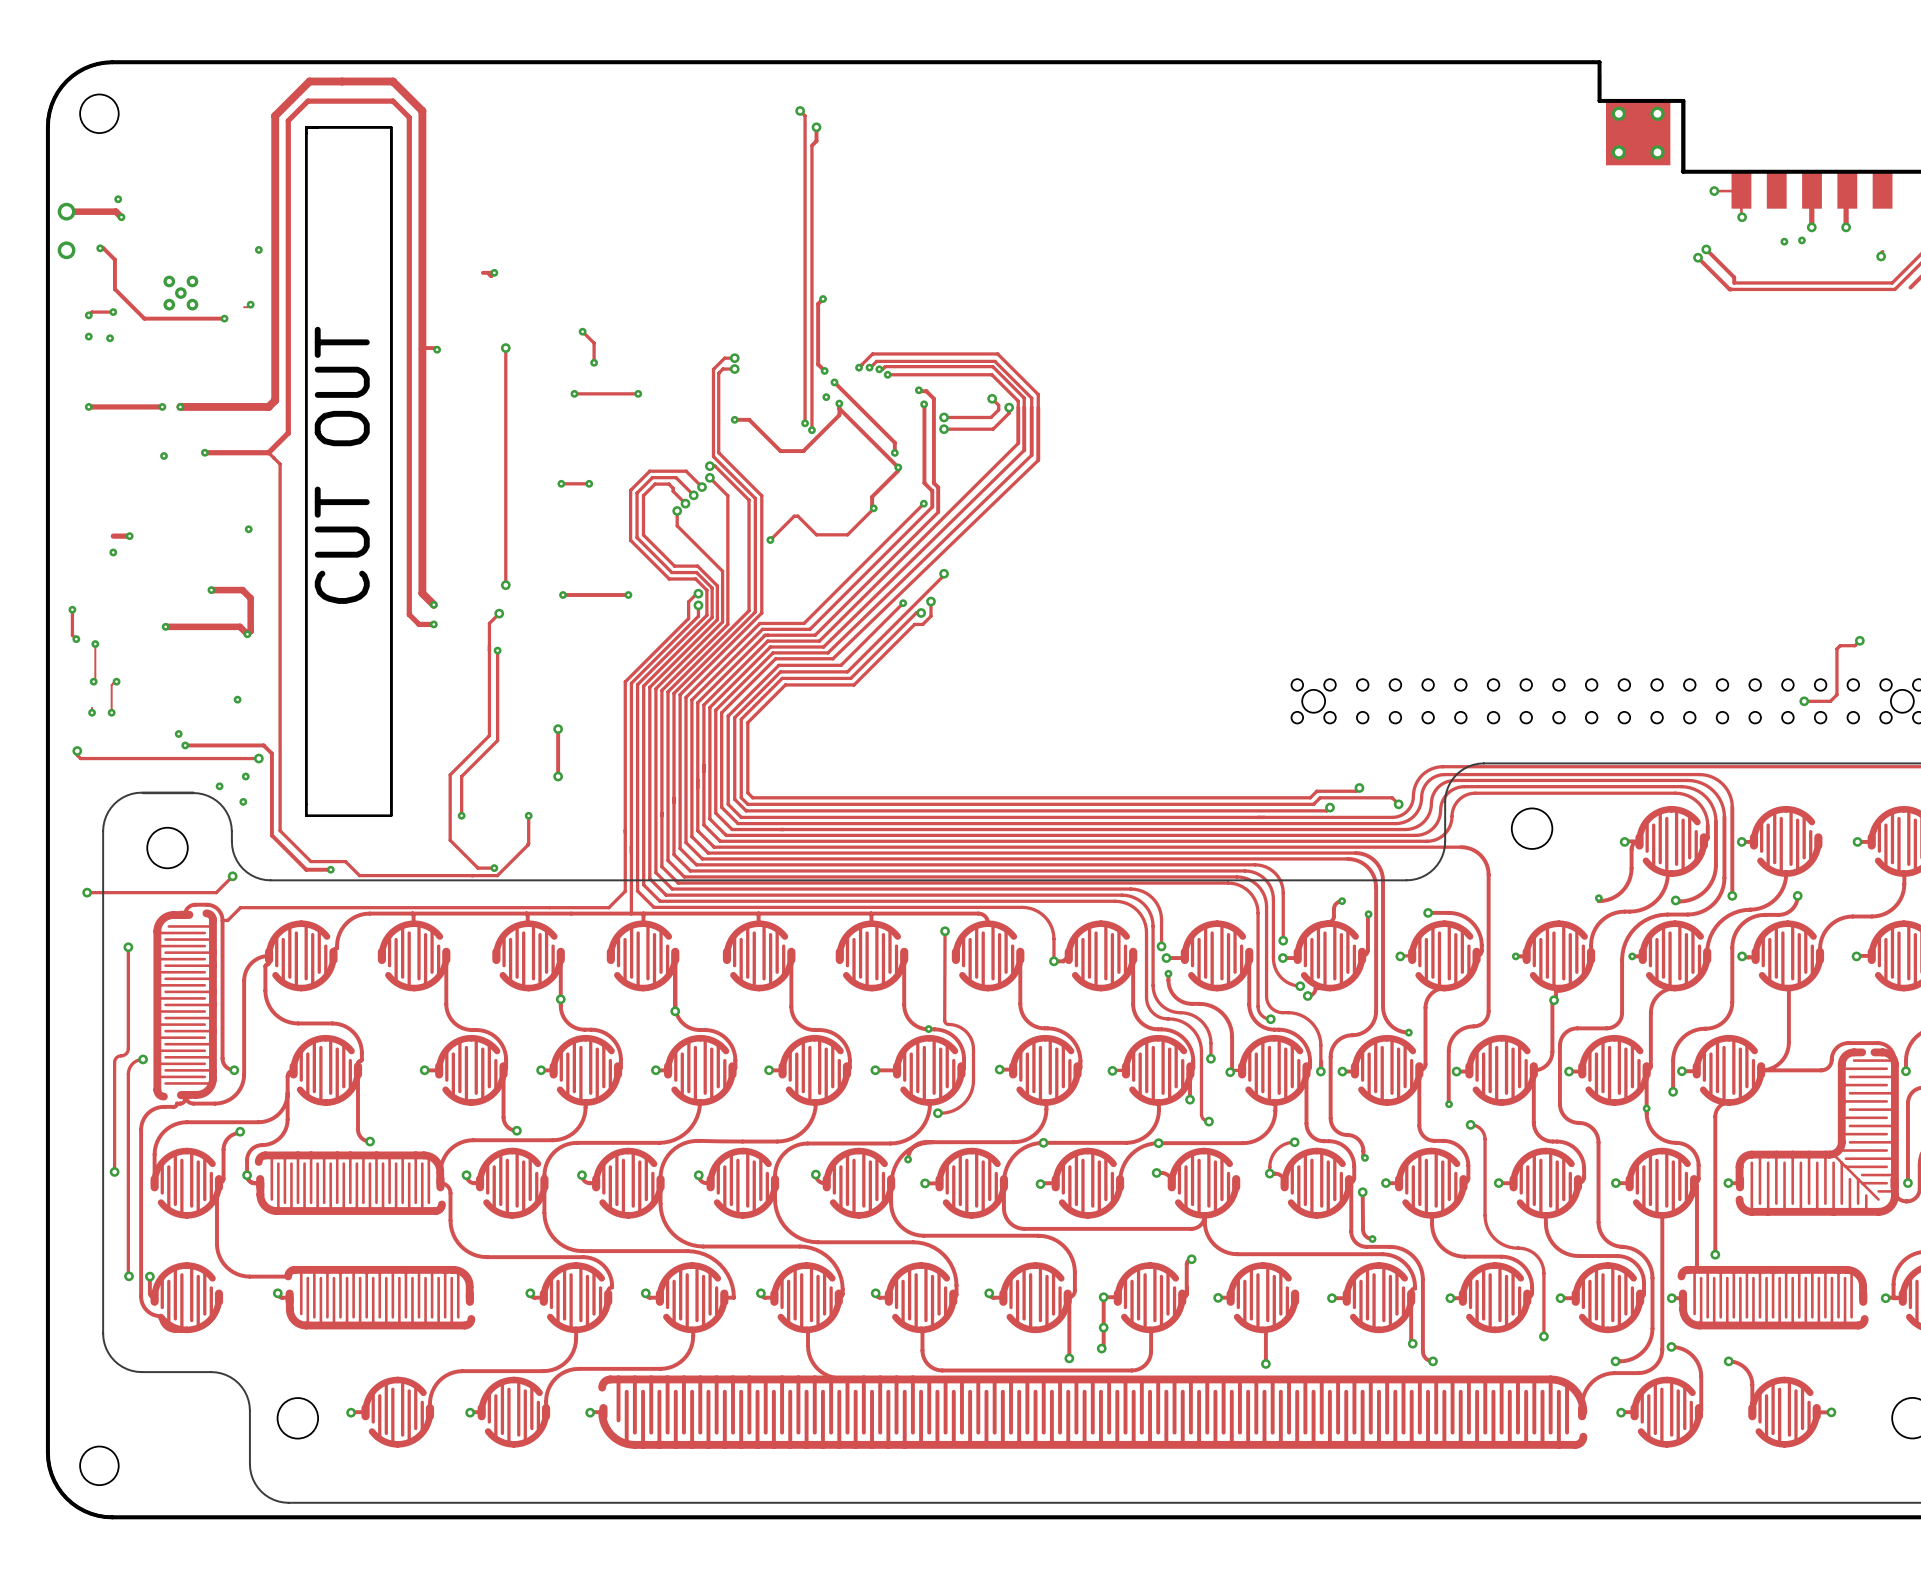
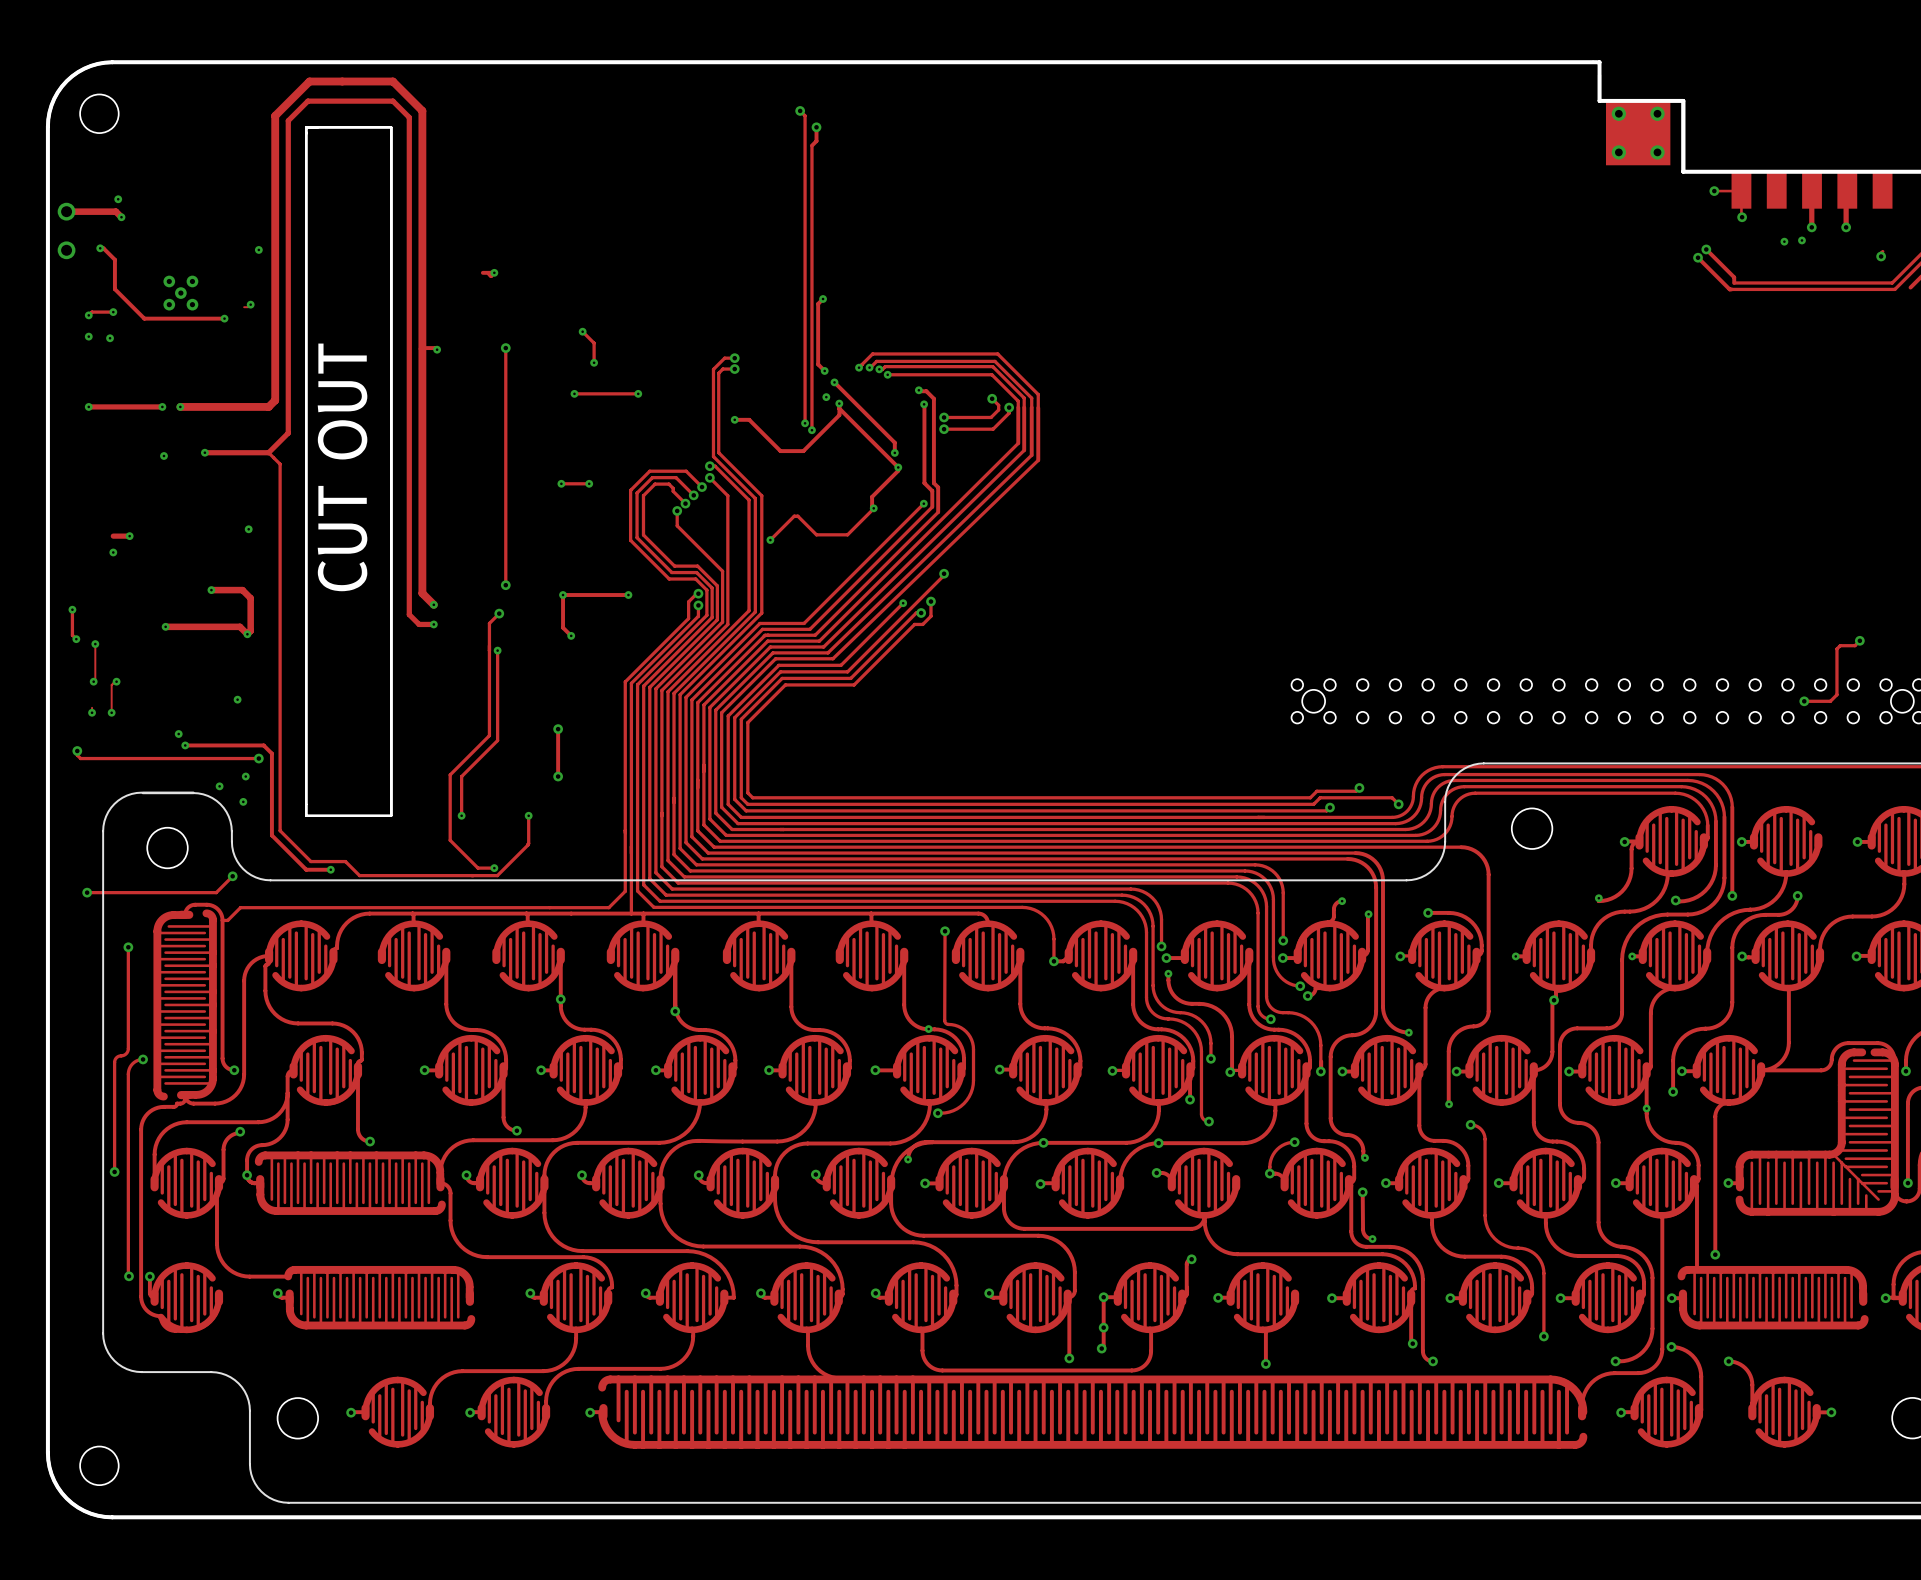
track: none -> (563, 595) (563, 627) (571, 635)
via: none -> (571, 635)

